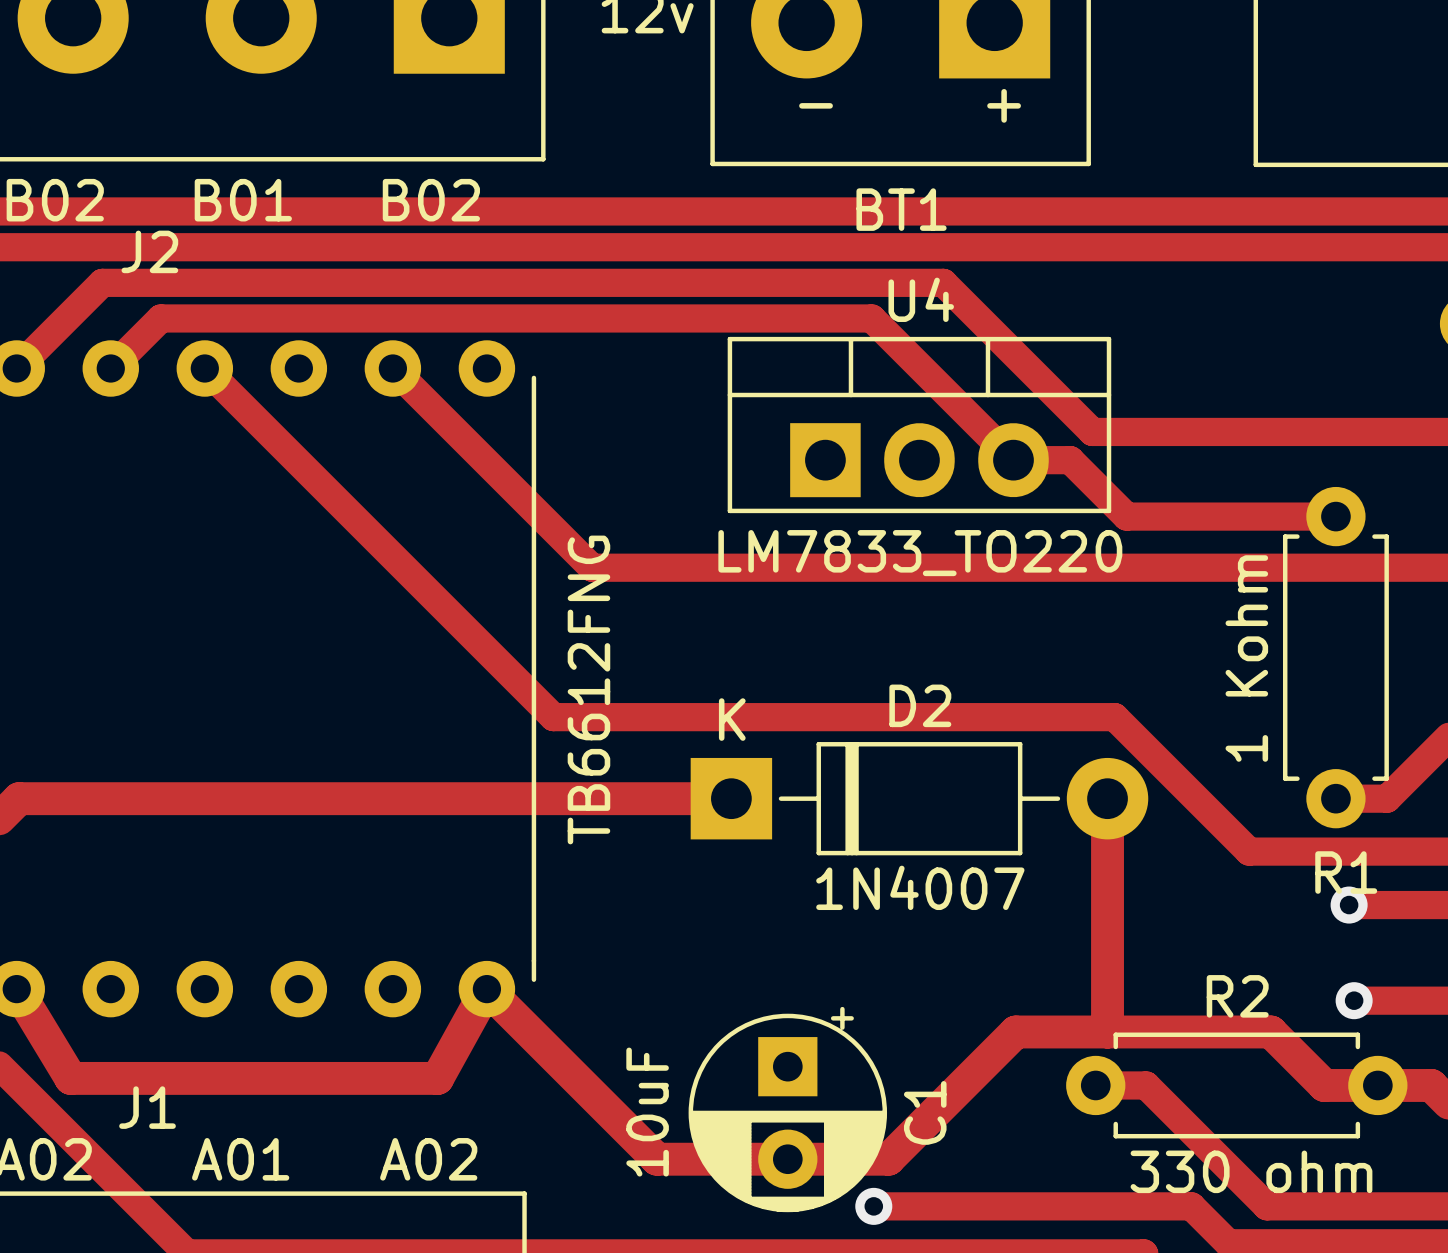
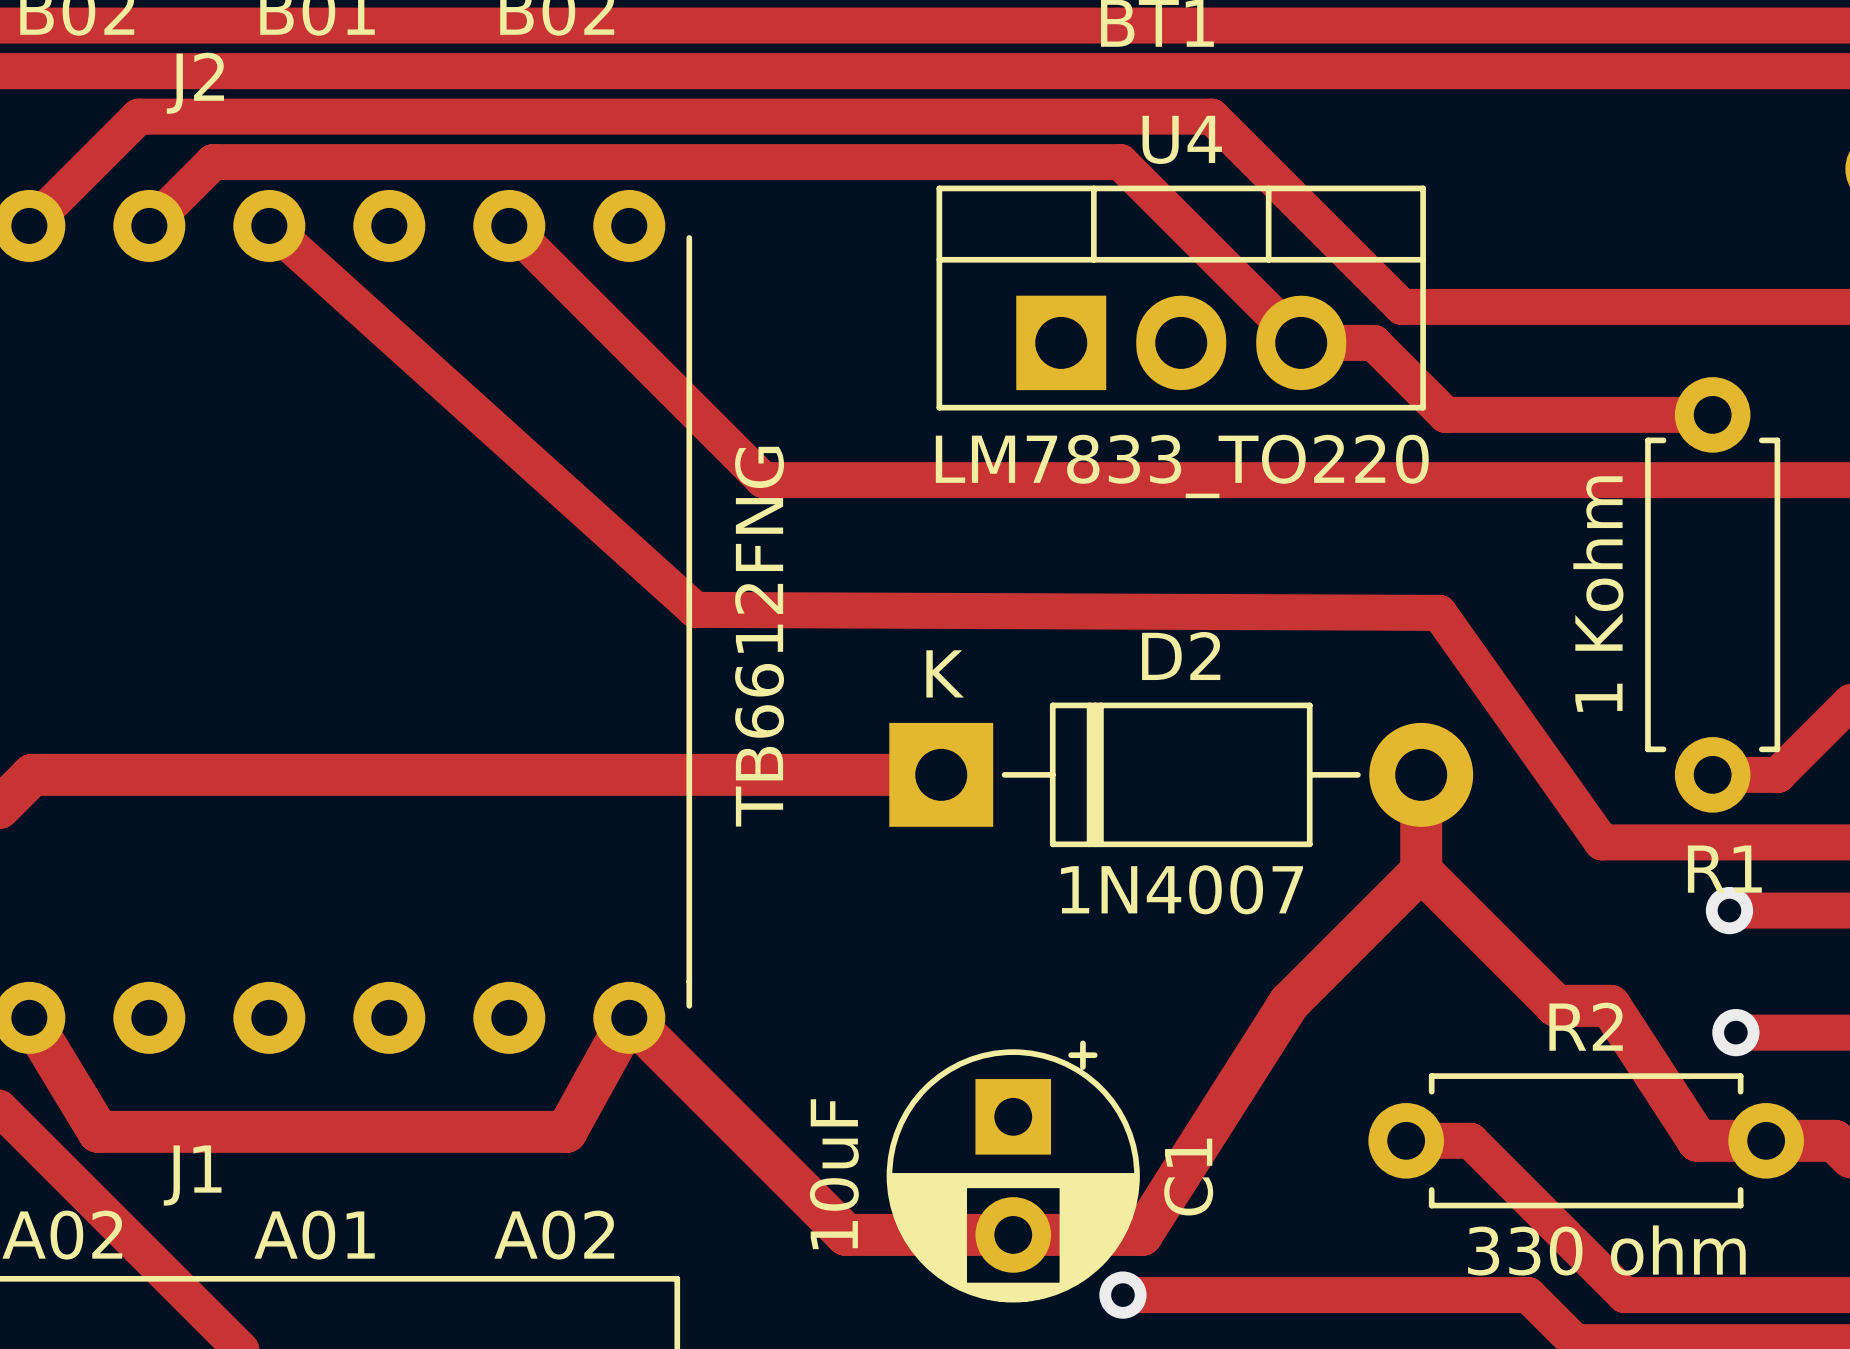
track: (204, 368) (553, 717) (1114, 717) (1249, 851) -> (269, 225) (695, 609) (1439, 612) (1601, 842)
track: (1107, 873) (1107, 1031) -> none
track: (1324, 1085) (1270, 1031) (1015, 1031) (888, 1159) -> (1697, 1140) (1610, 1005) (1556, 1005) (1421, 870) (1289, 1002) (1141, 1234)

